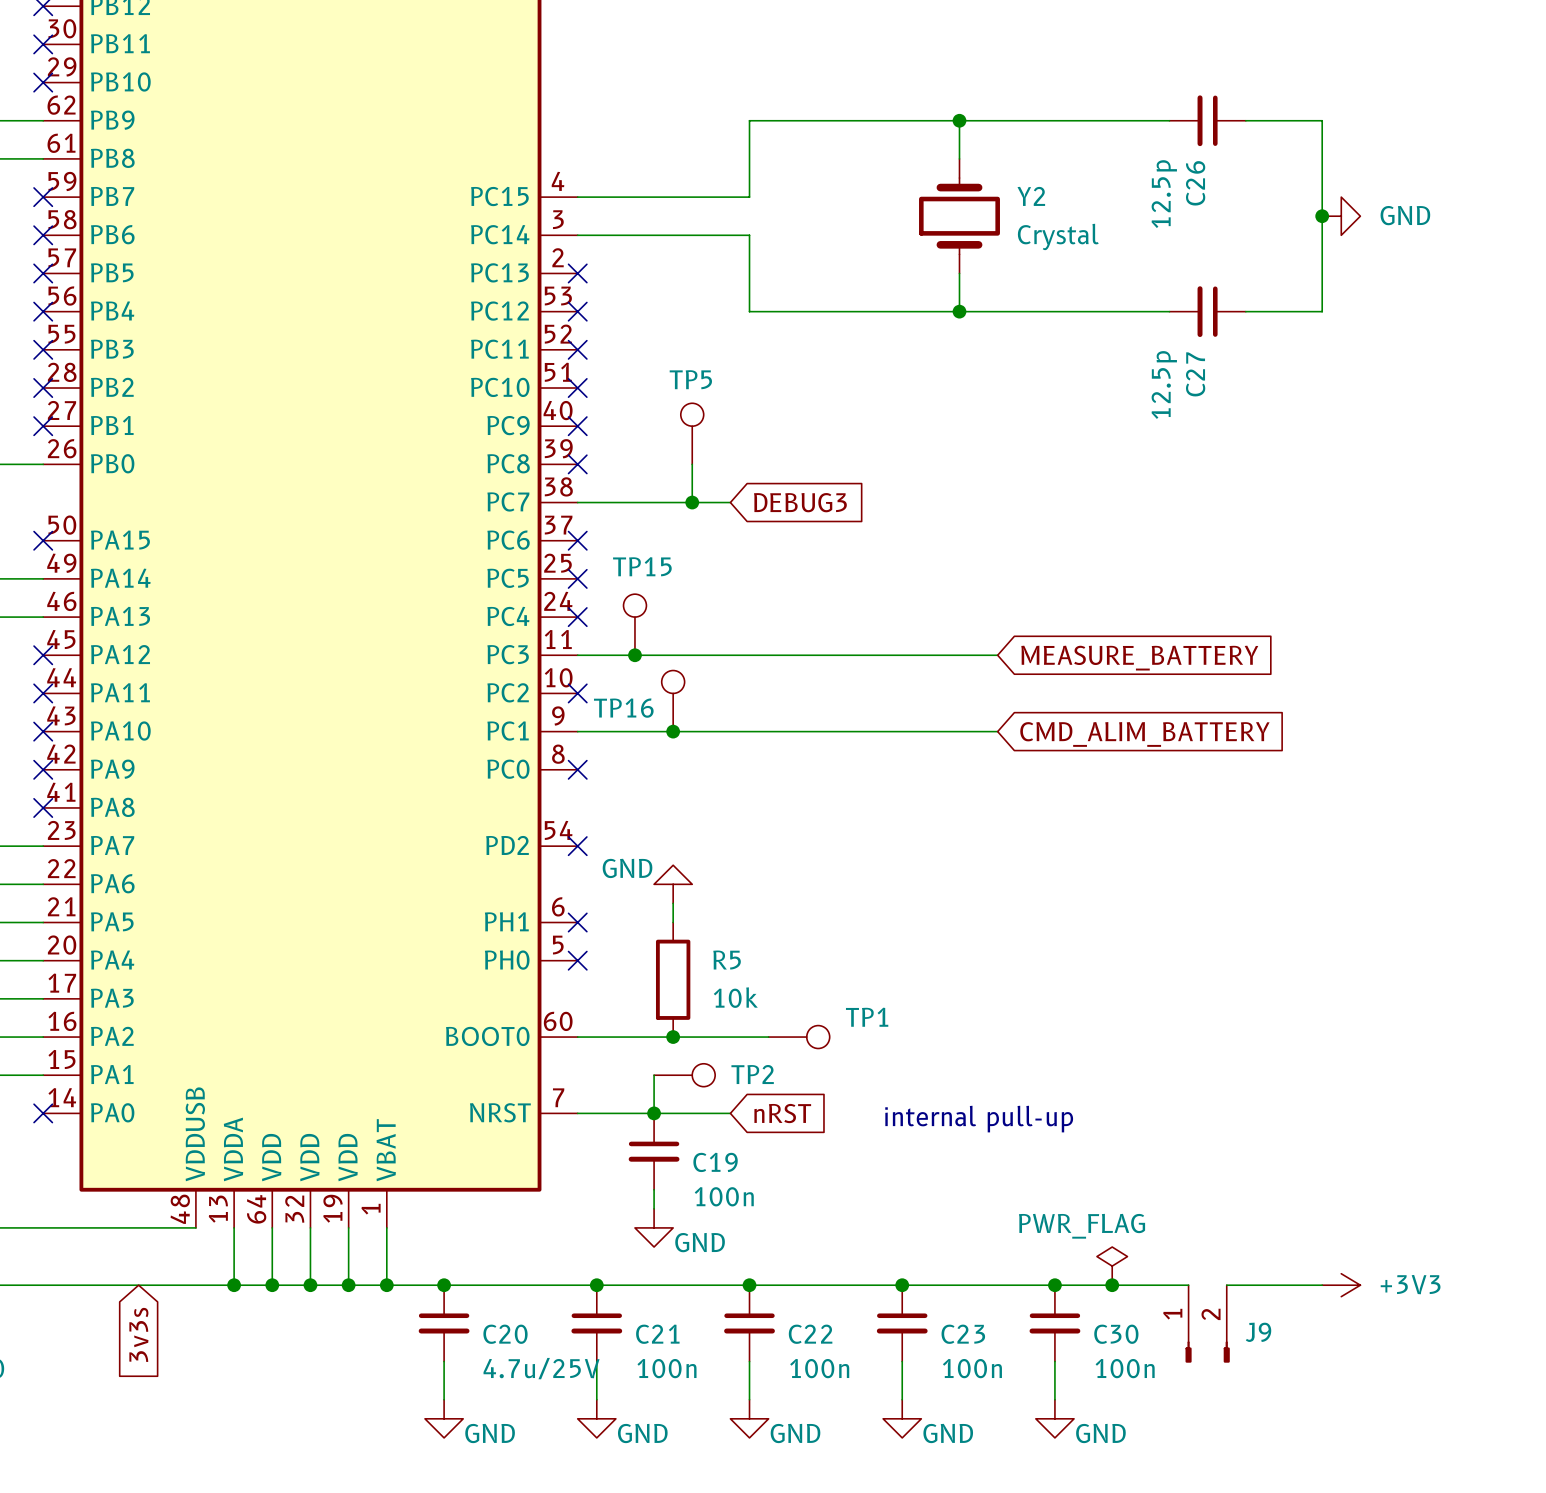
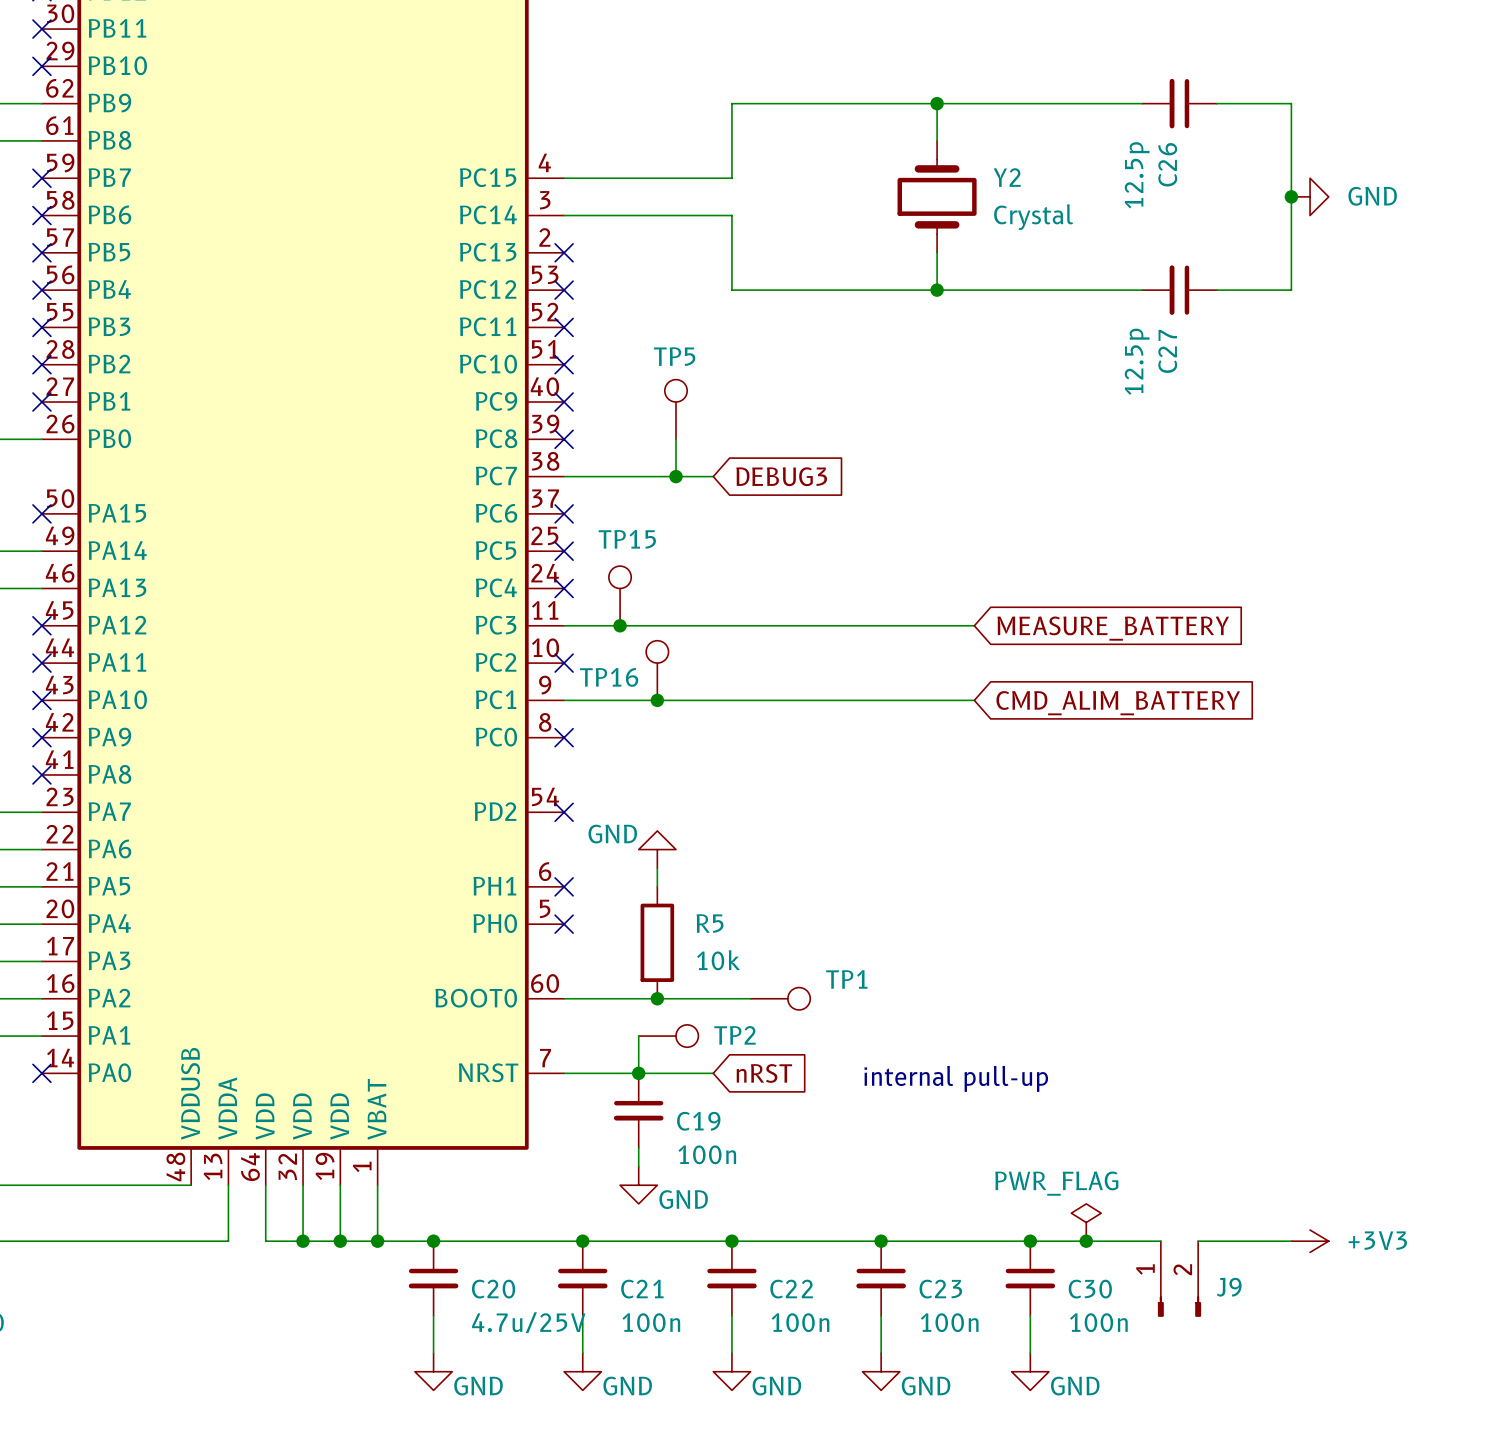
wire: (234, 1285) (272, 1285) -> none
junction: (234, 1285) -> none
junction: (272, 1285) -> none
global label: 3v3s (138, 1334) -> none

